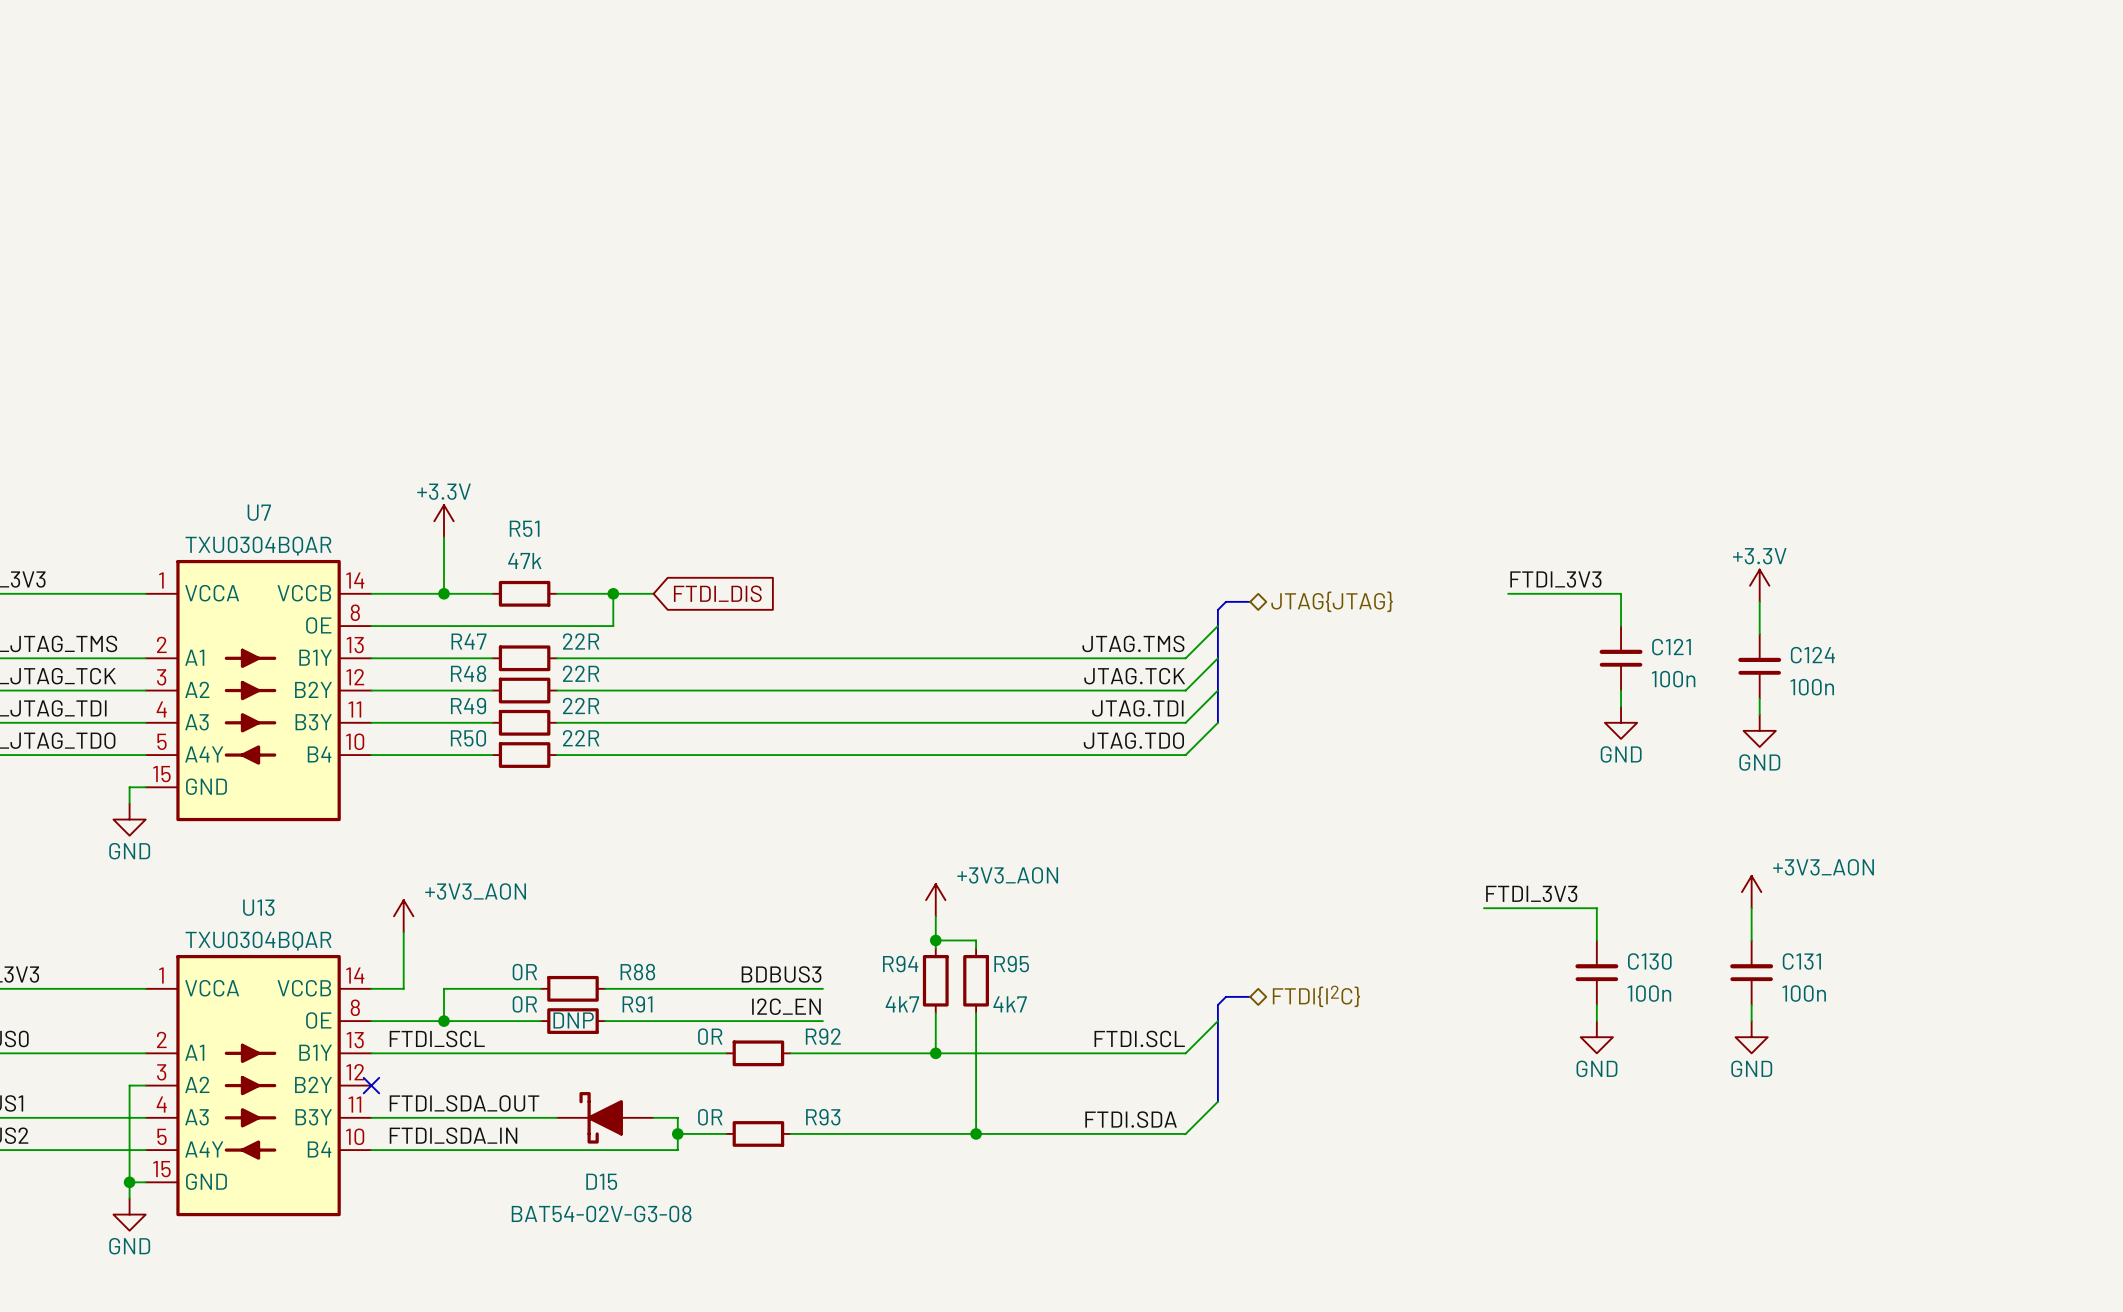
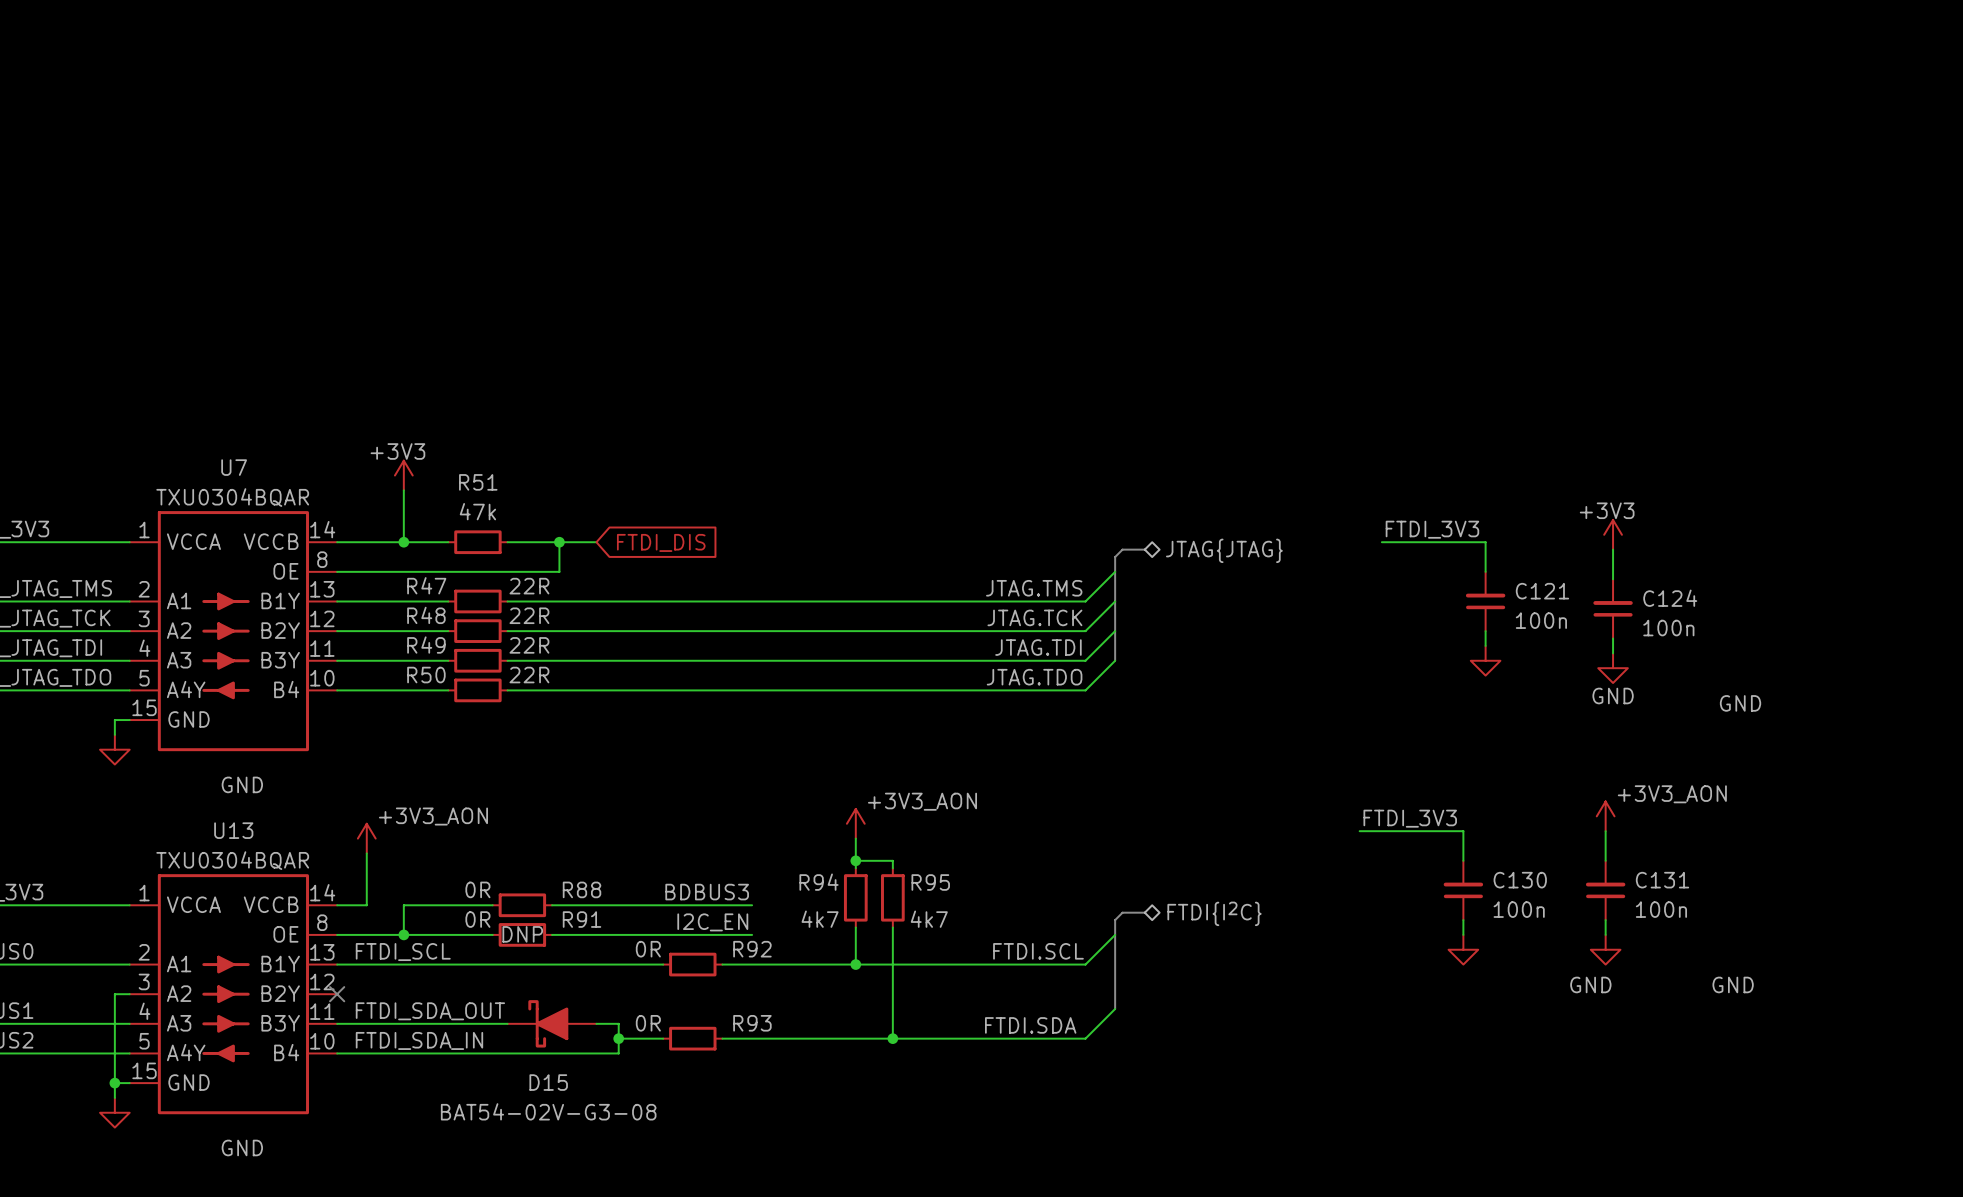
power symbol: +3.3V (443, 521) -> +3V3 (403, 475)
power symbol: +3.3V (1759, 585) -> +3V3 (1613, 534)
power symbol text position: GND (1621, 754) -> GND (1613, 696)
power symbol text position: GND (1759, 762) -> GND (1740, 703)
power symbol text position: GND (129, 851) -> GND (242, 784)
power symbol text position: GND (1596, 1068) -> GND (1590, 984)
power symbol text position: GND (1751, 1068) -> GND (1733, 984)
power symbol text position: GND (129, 1246) -> GND (242, 1147)

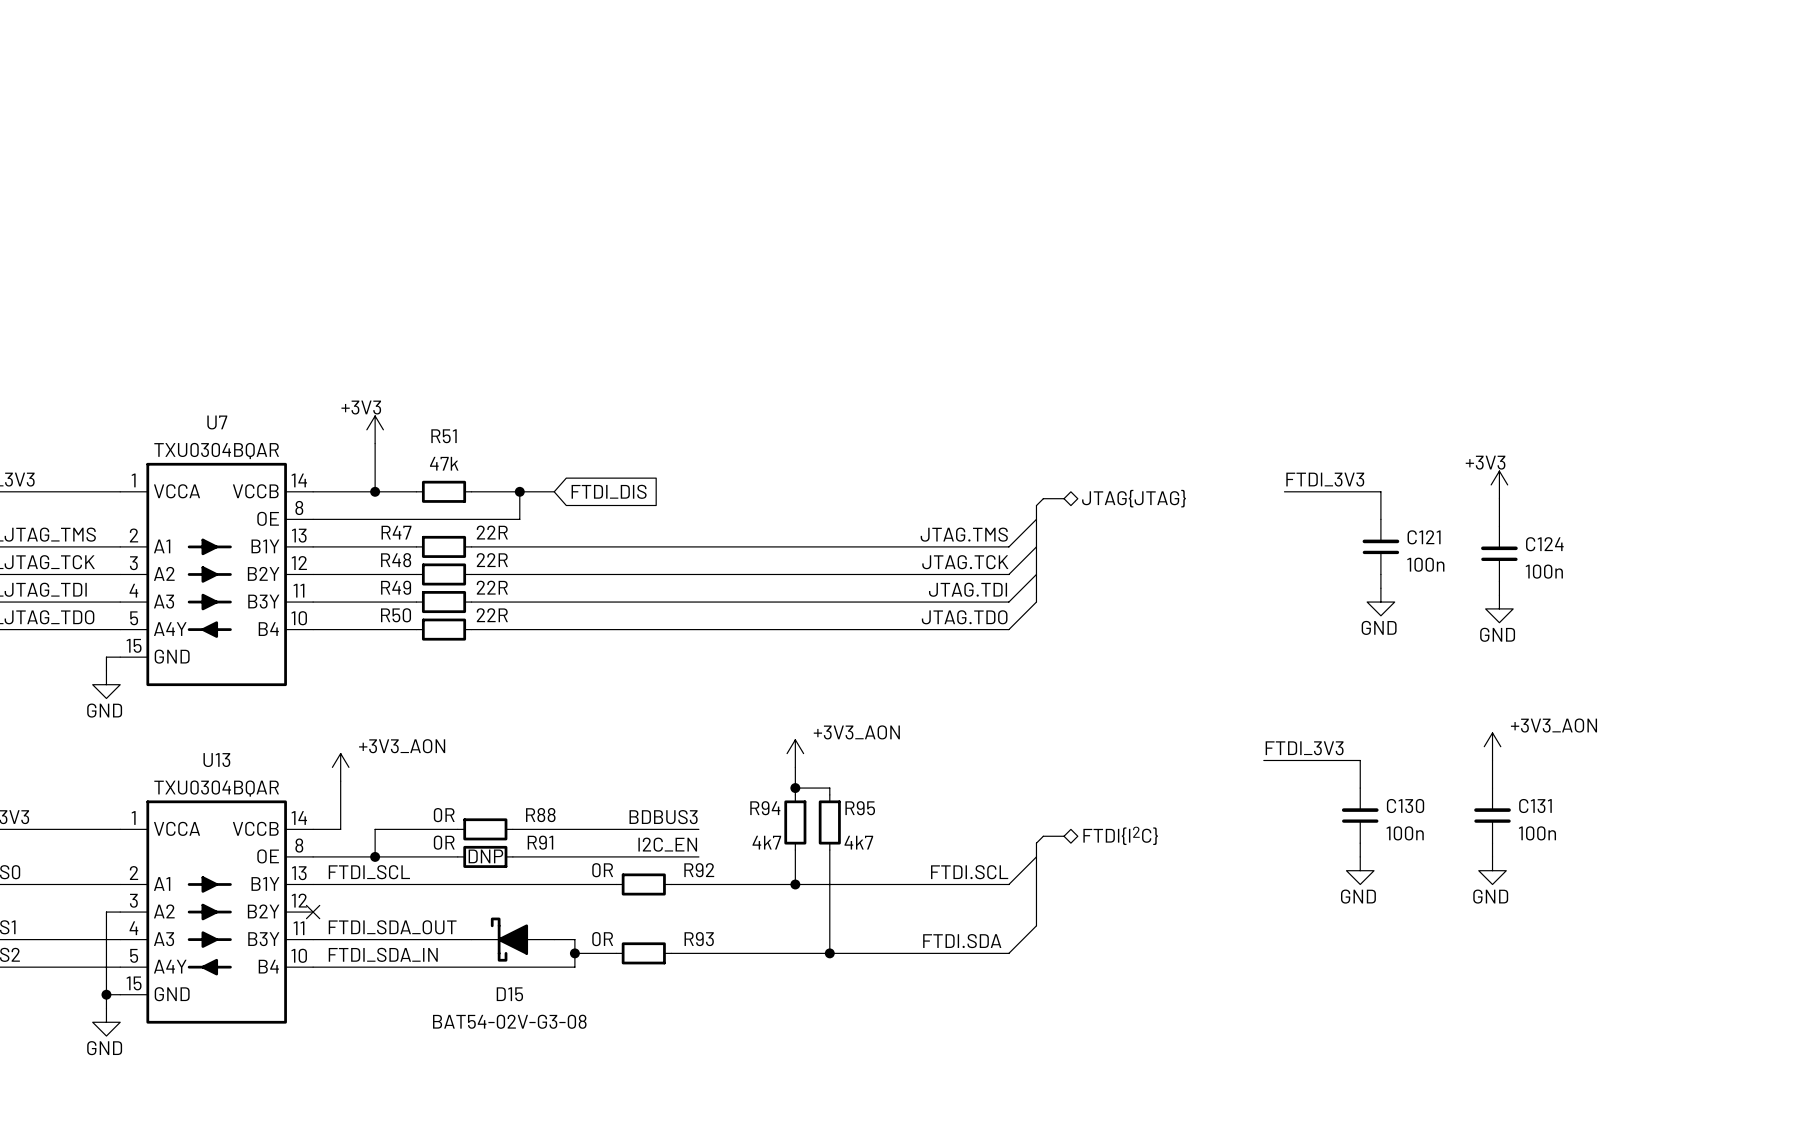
power symbol text position: GND (1613, 696) -> GND (1379, 627)
power symbol text position: GND (1740, 703) -> GND (1497, 634)
power symbol text position: GND (242, 784) -> GND (104, 710)
power symbol text position: GND (1590, 984) -> GND (1358, 896)
power symbol text position: GND (1733, 984) -> GND (1490, 896)
power symbol text position: GND (242, 1147) -> GND (104, 1048)

